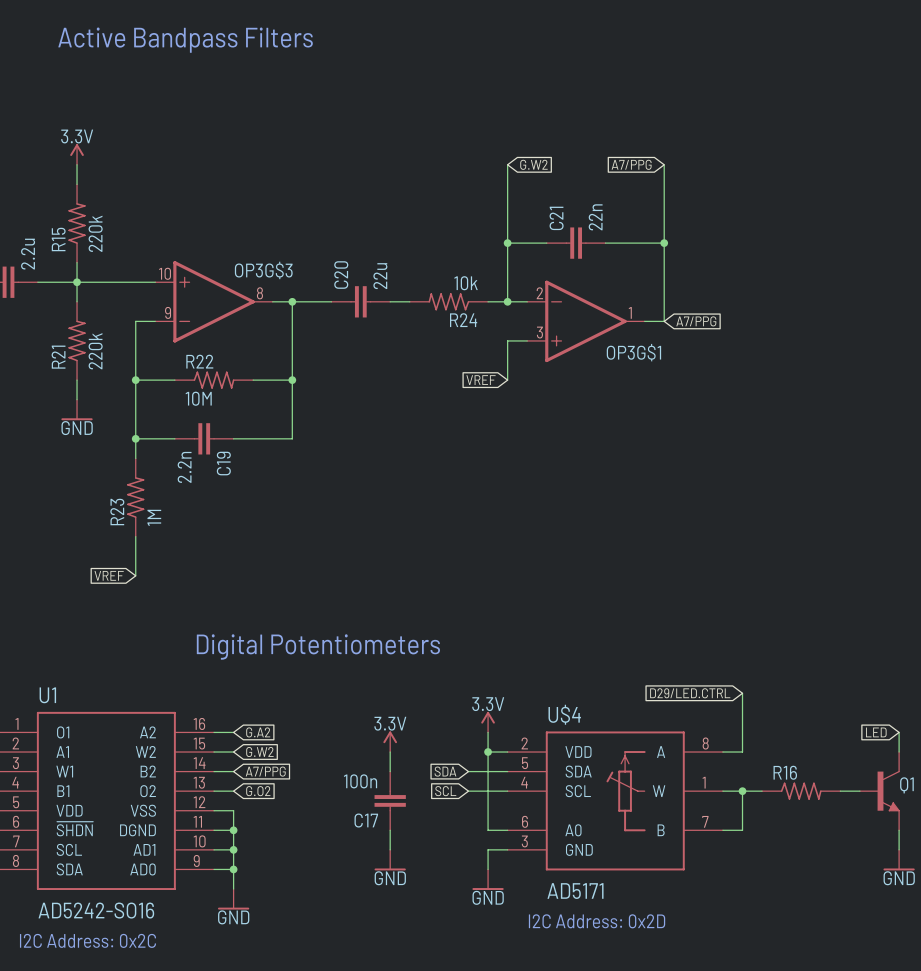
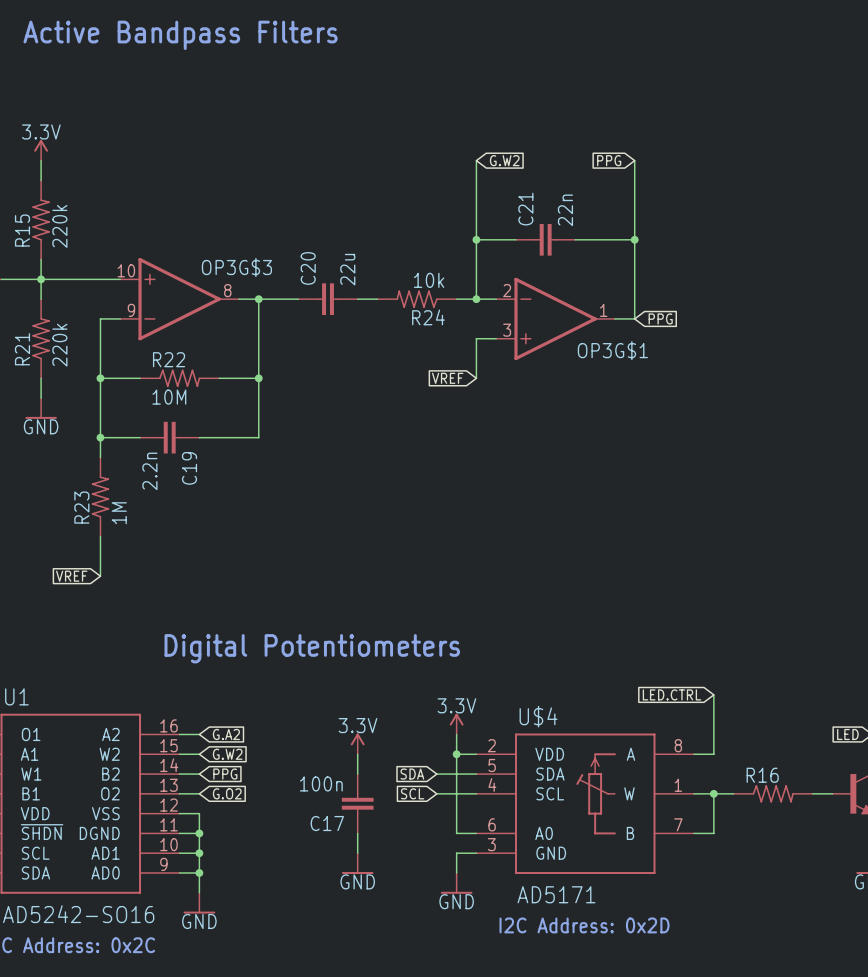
global label: A7/PPG (631, 164) -> PPG (609, 160)
global label: A7/PPG (696, 321) -> PPG (660, 318)
global label: D29/LED.CTRL (690, 693) -> LED.CTRL (672, 694)
global label: A7/PPG (265, 771) -> PPG (225, 774)

